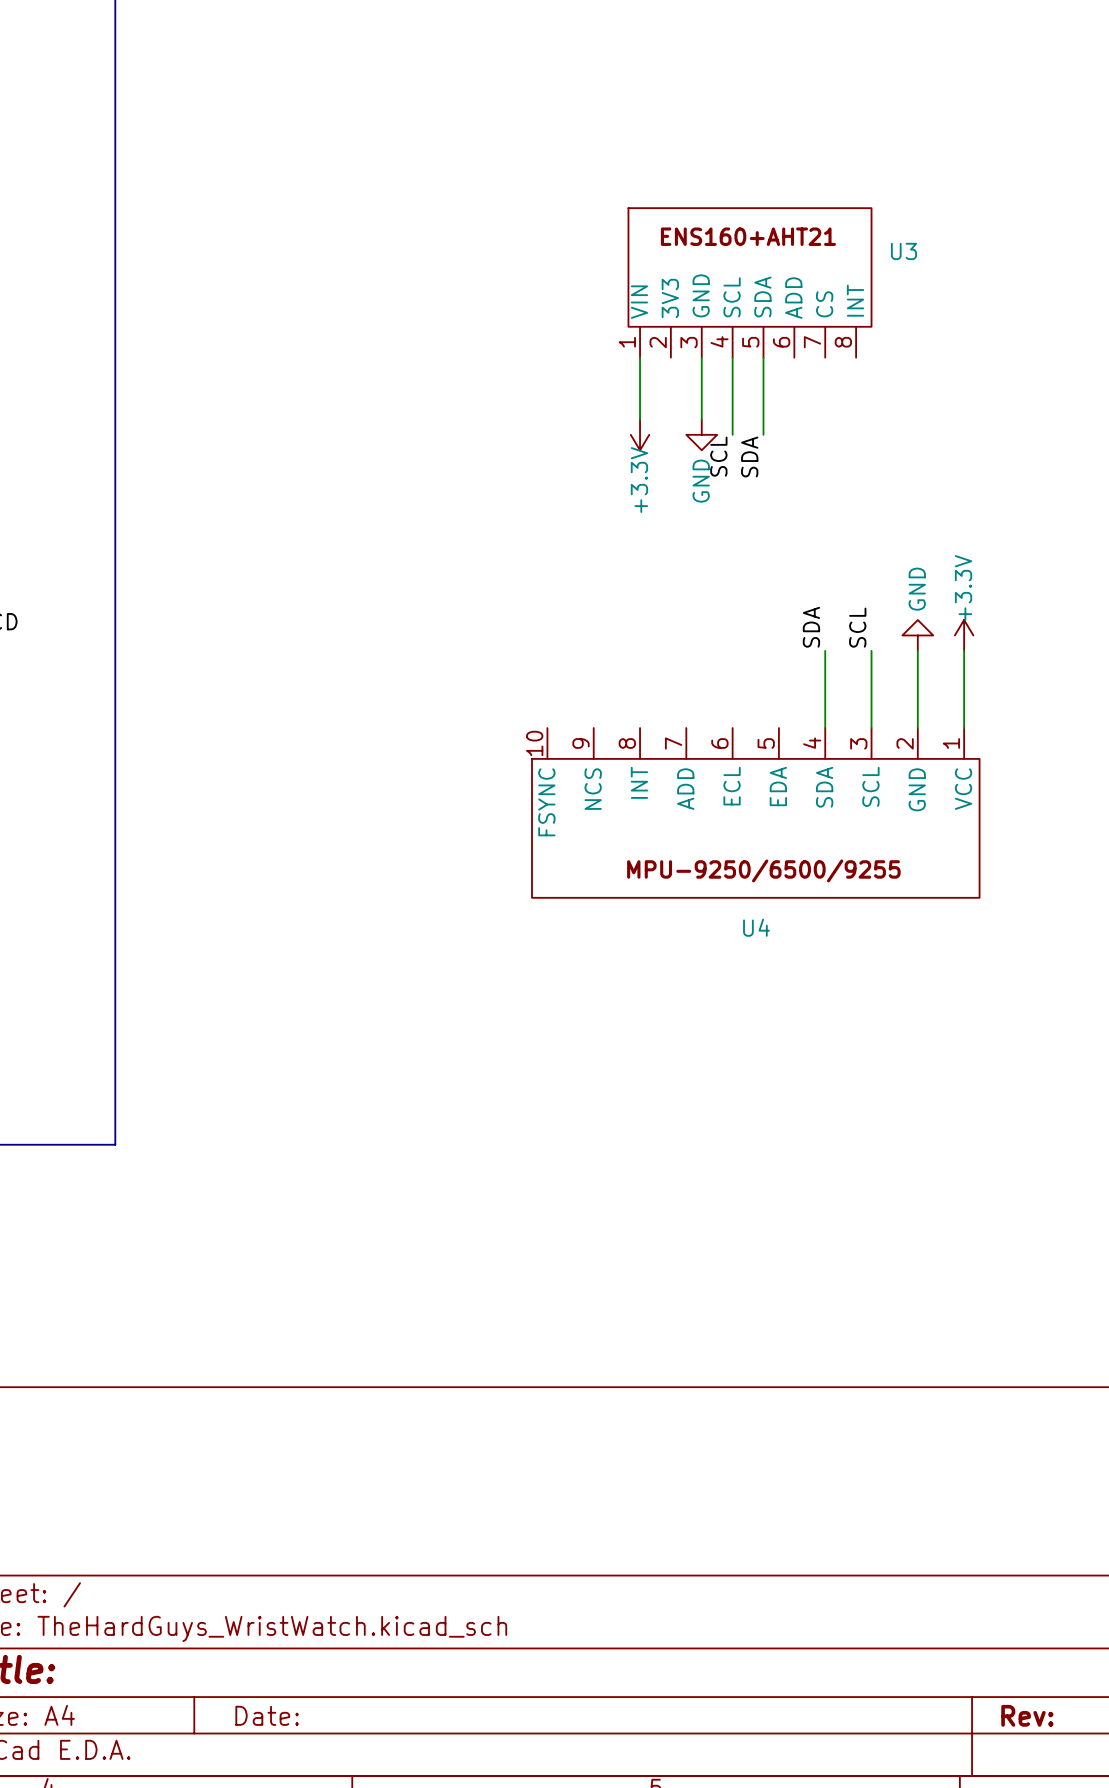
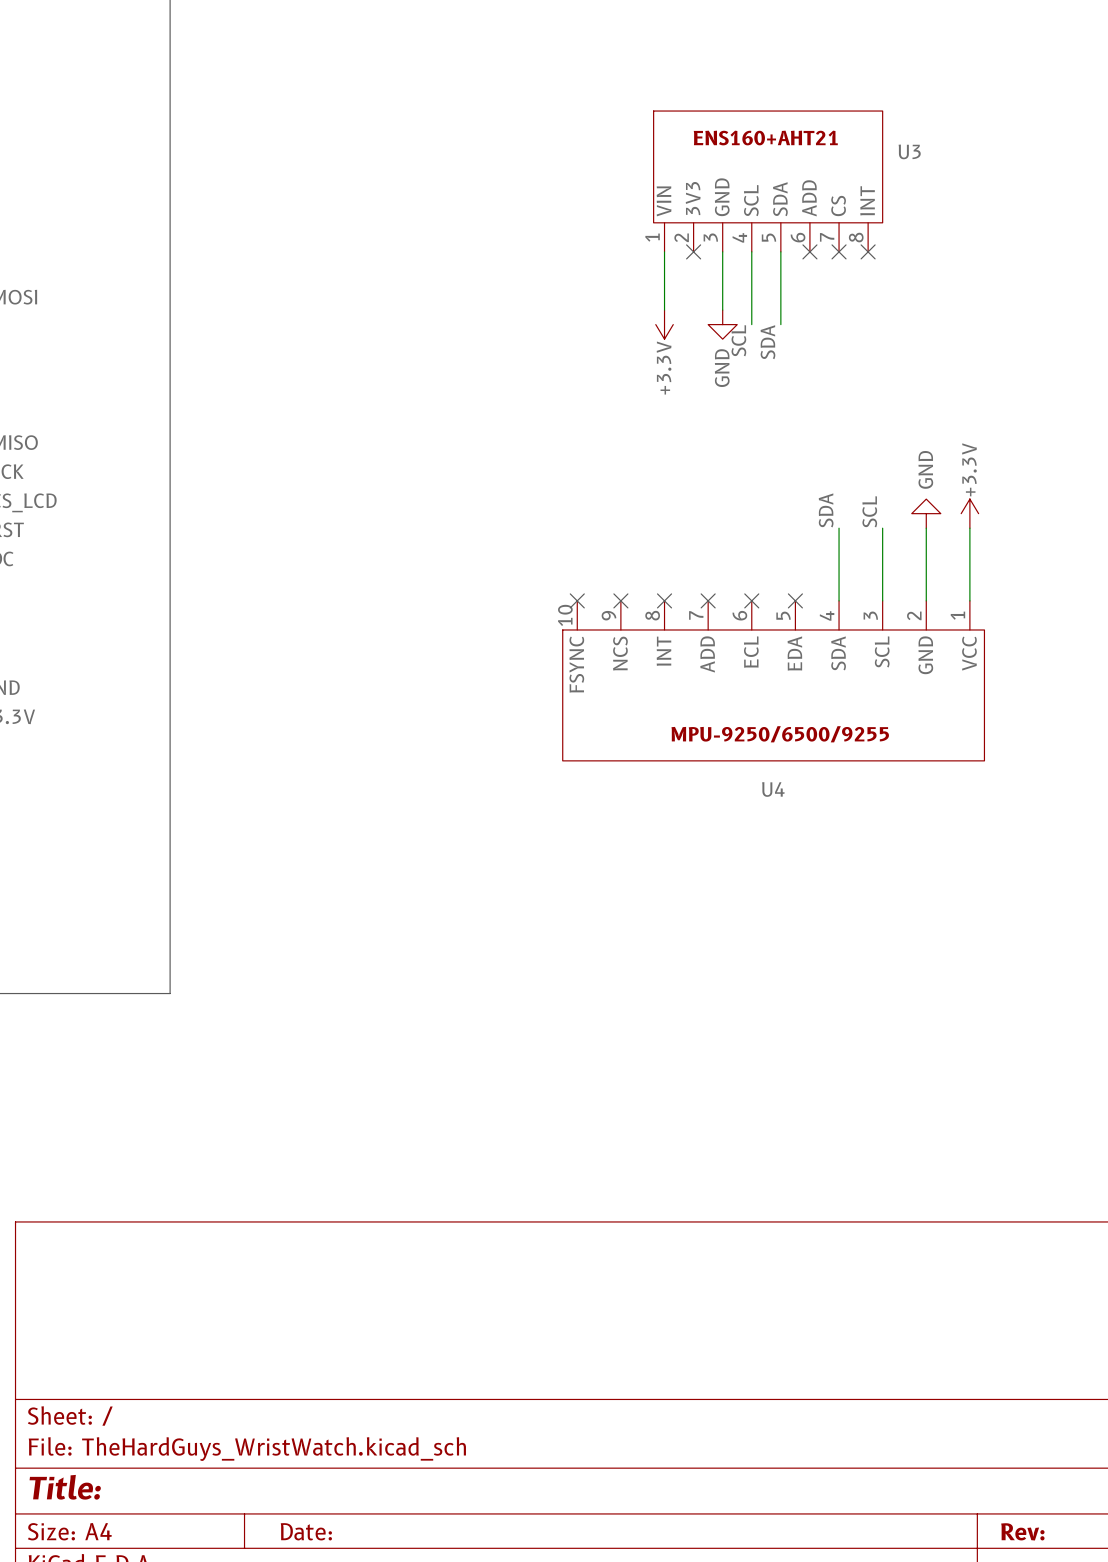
no-connect mark: none -> (693, 251)
no-connect mark: none -> (809, 251)
no-connect mark: none -> (839, 251)
no-connect mark: none -> (868, 251)
no-connect mark: none -> (577, 600)
no-connect mark: none -> (620, 600)
no-connect mark: none -> (664, 600)
no-connect mark: none -> (708, 600)
no-connect mark: none -> (751, 600)
no-connect mark: none -> (795, 600)

